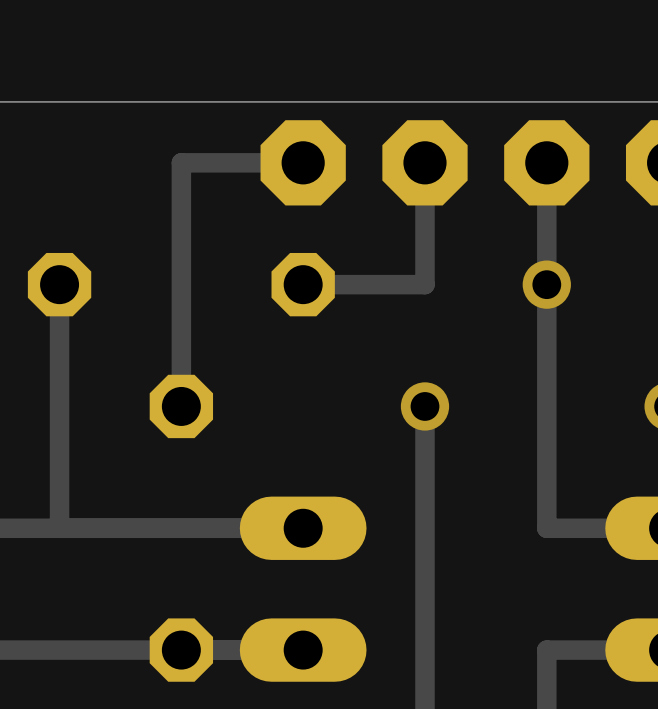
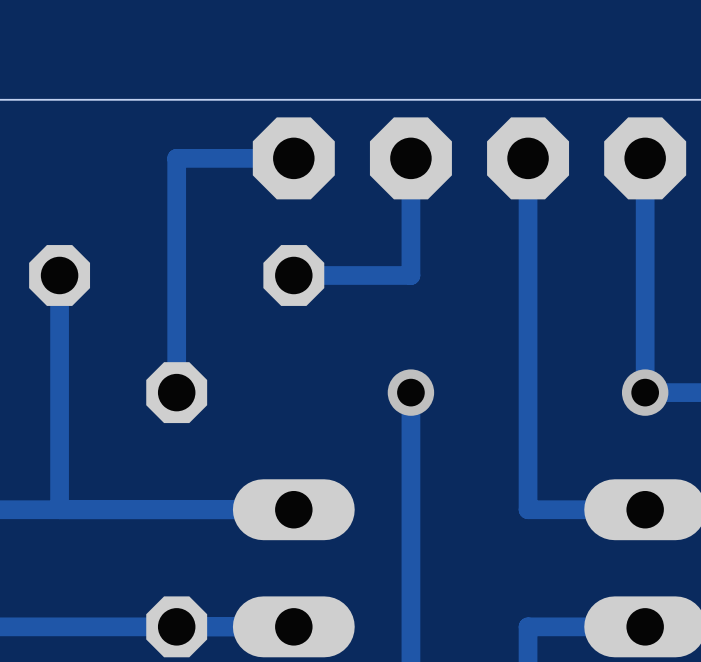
via: (546, 284) -> none

